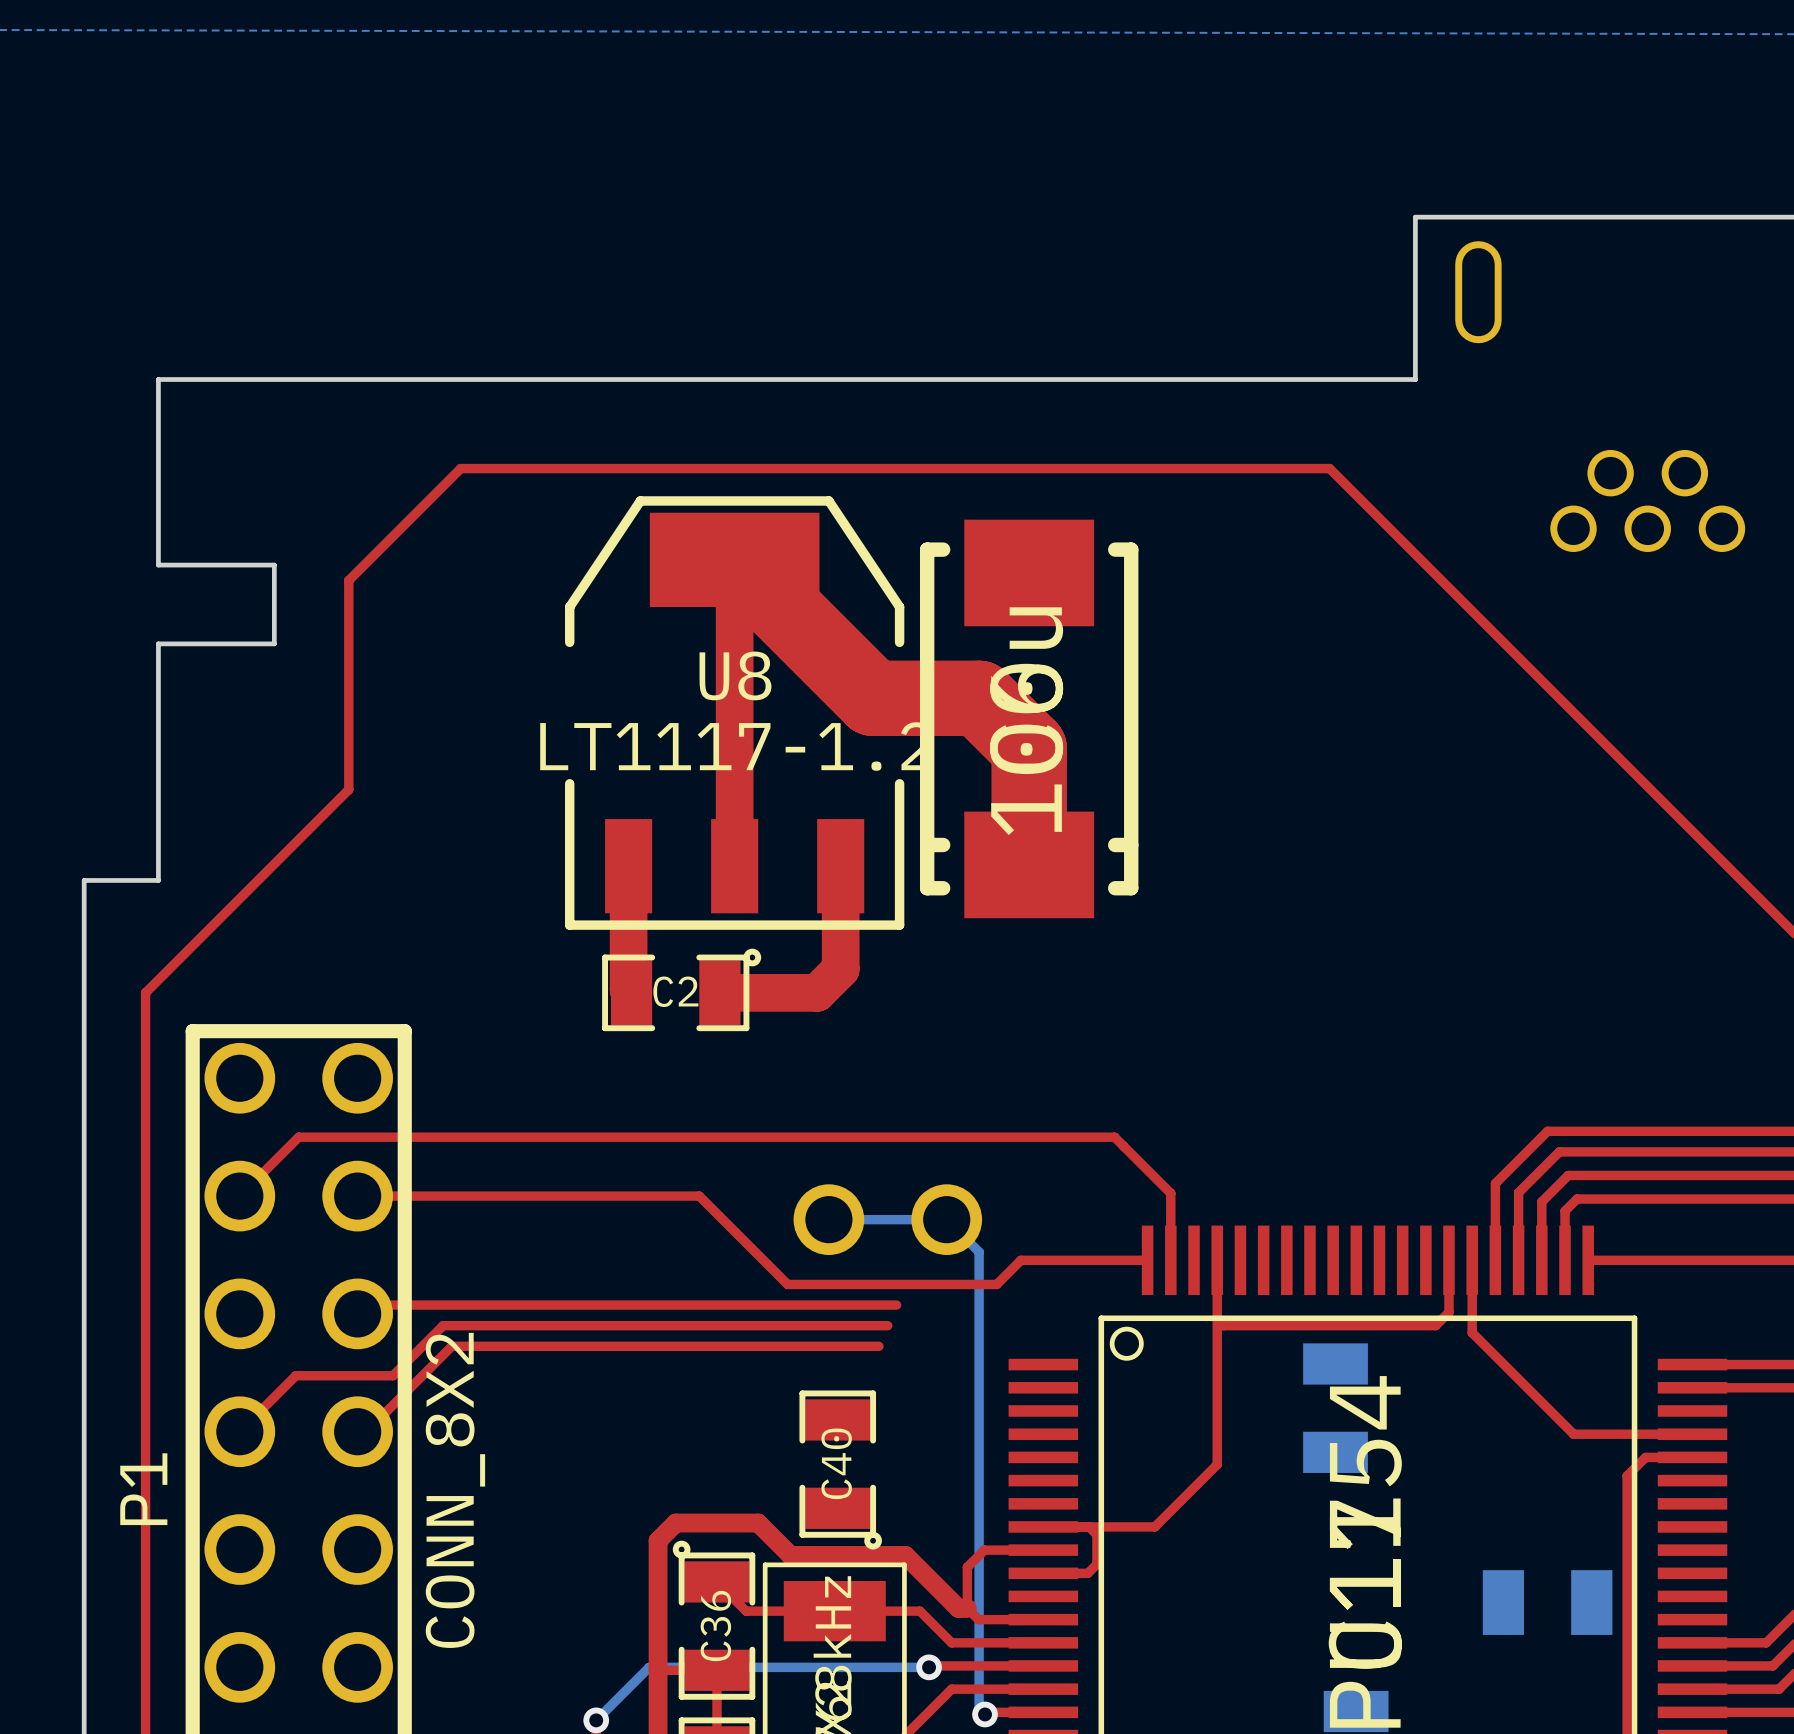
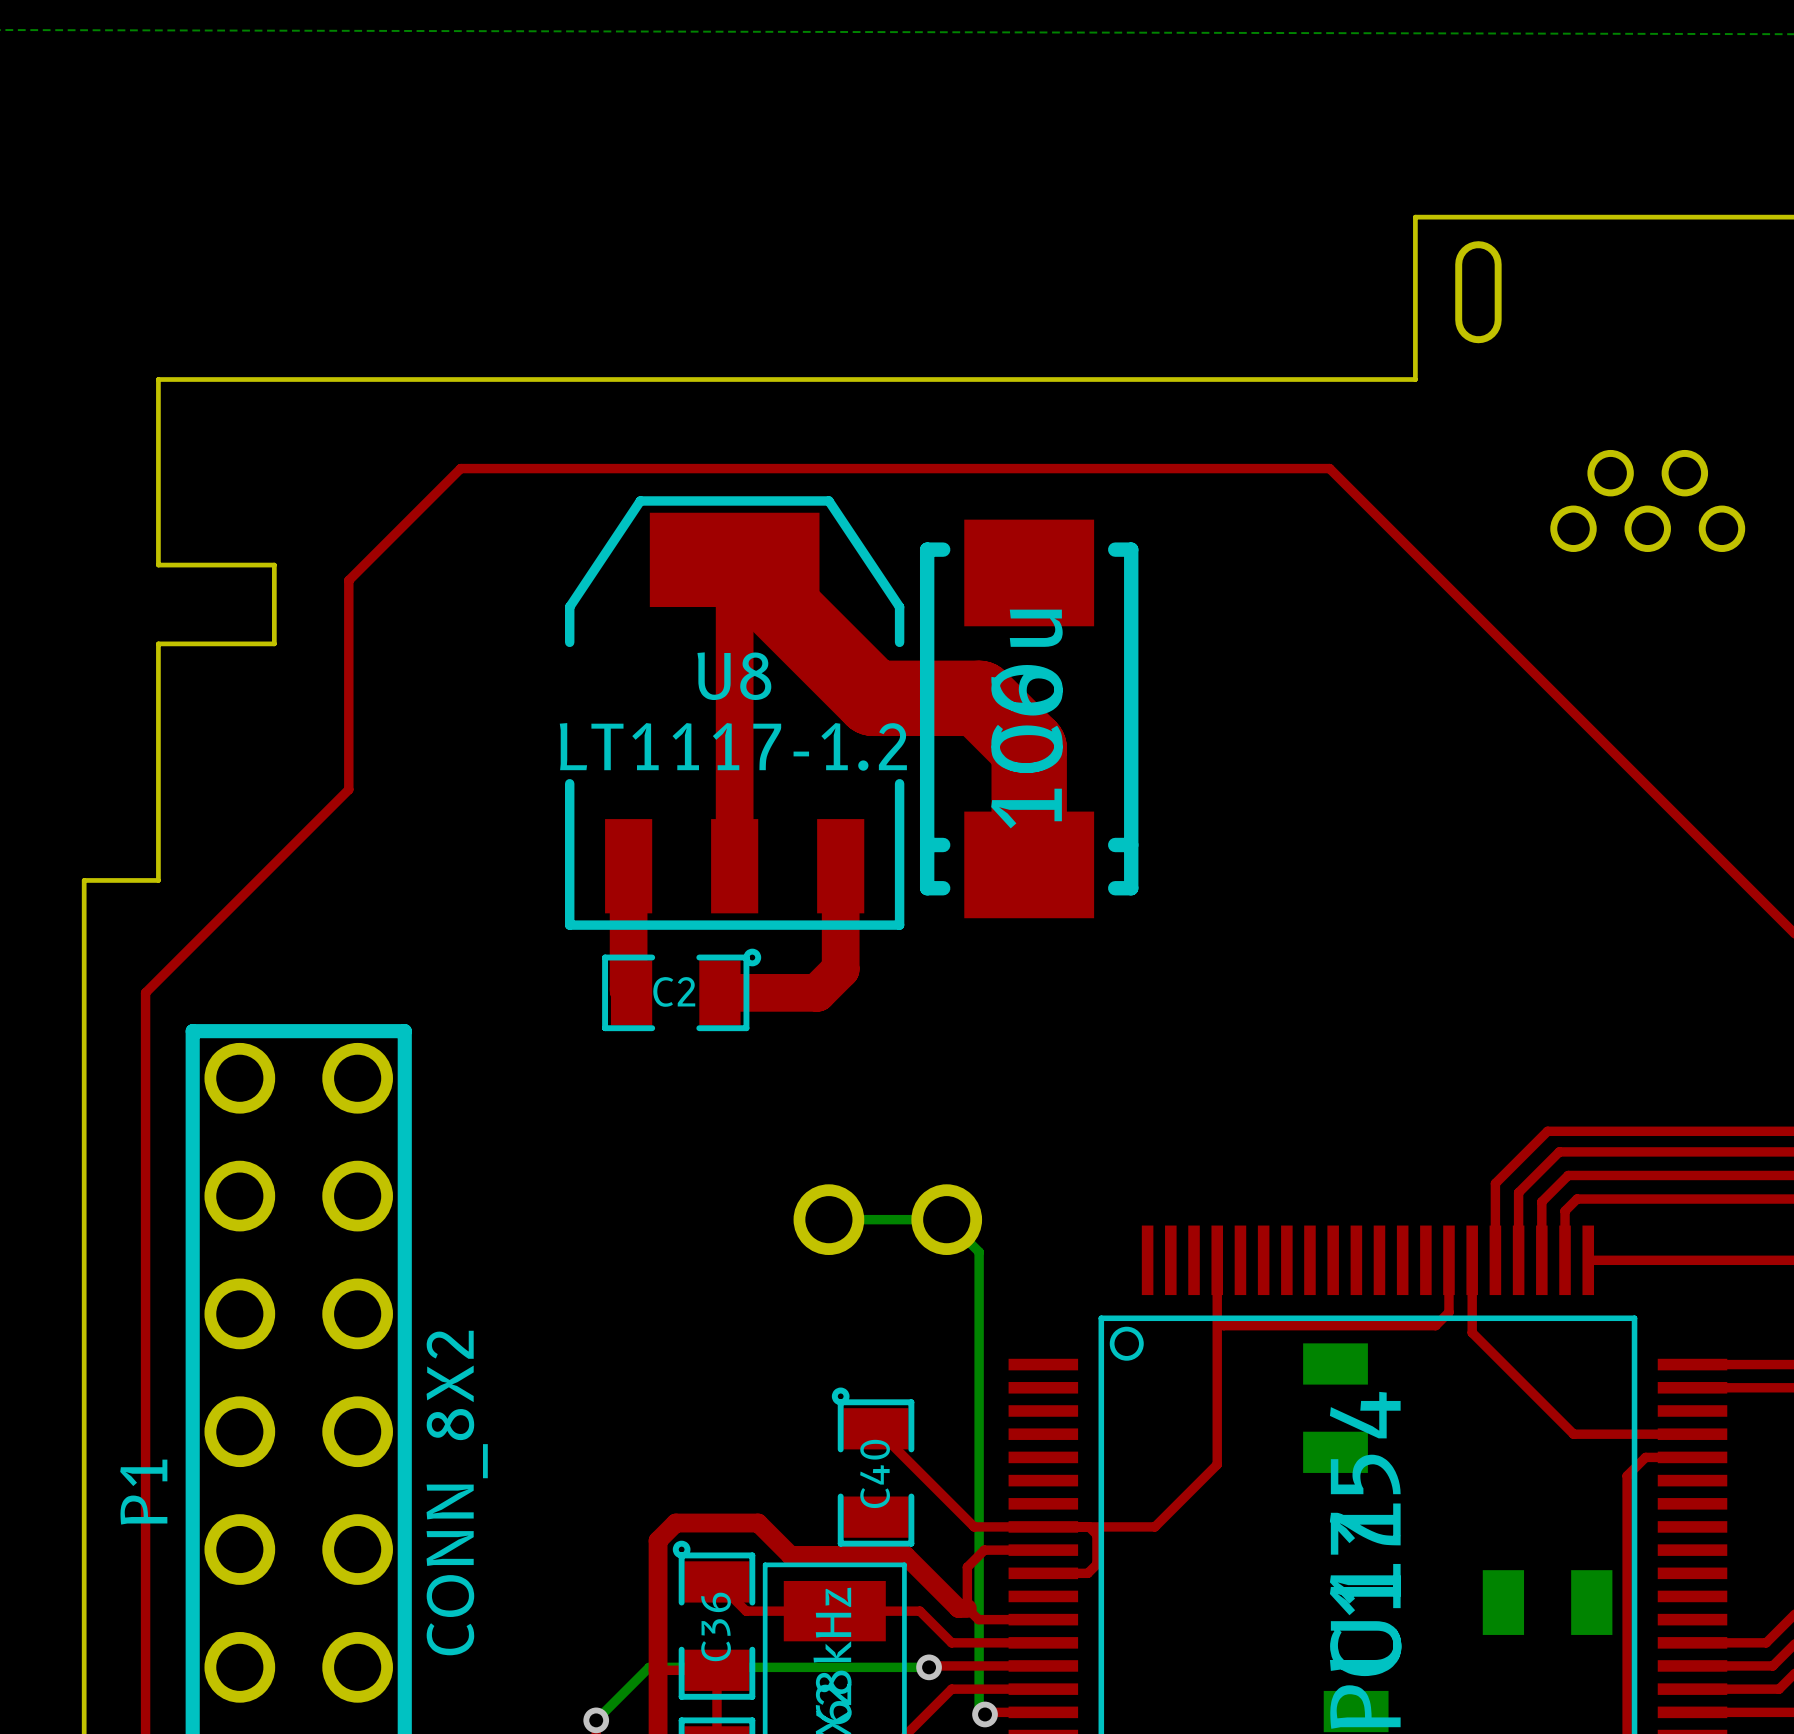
top track: (239, 1196) (298, 1137) (1114, 1137) (1170, 1193) (1170, 1260) -> none
top track: (357, 1196) (699, 1196) (787, 1284) (996, 1284) (1020, 1260) (1147, 1260) -> none
top track: (896, 1305) (366, 1305) (357, 1313) -> none
top track: (887, 1325) (443, 1325) (392, 1375) (295, 1375) (239, 1431) -> none
top track: (878, 1346) (451, 1346) (366, 1431) (357, 1431) -> none
top track: none -> (876, 1428) (974, 1526) (1043, 1526)
C40 rotation: 0° (840, 1470) -> 180° (873, 1467)

